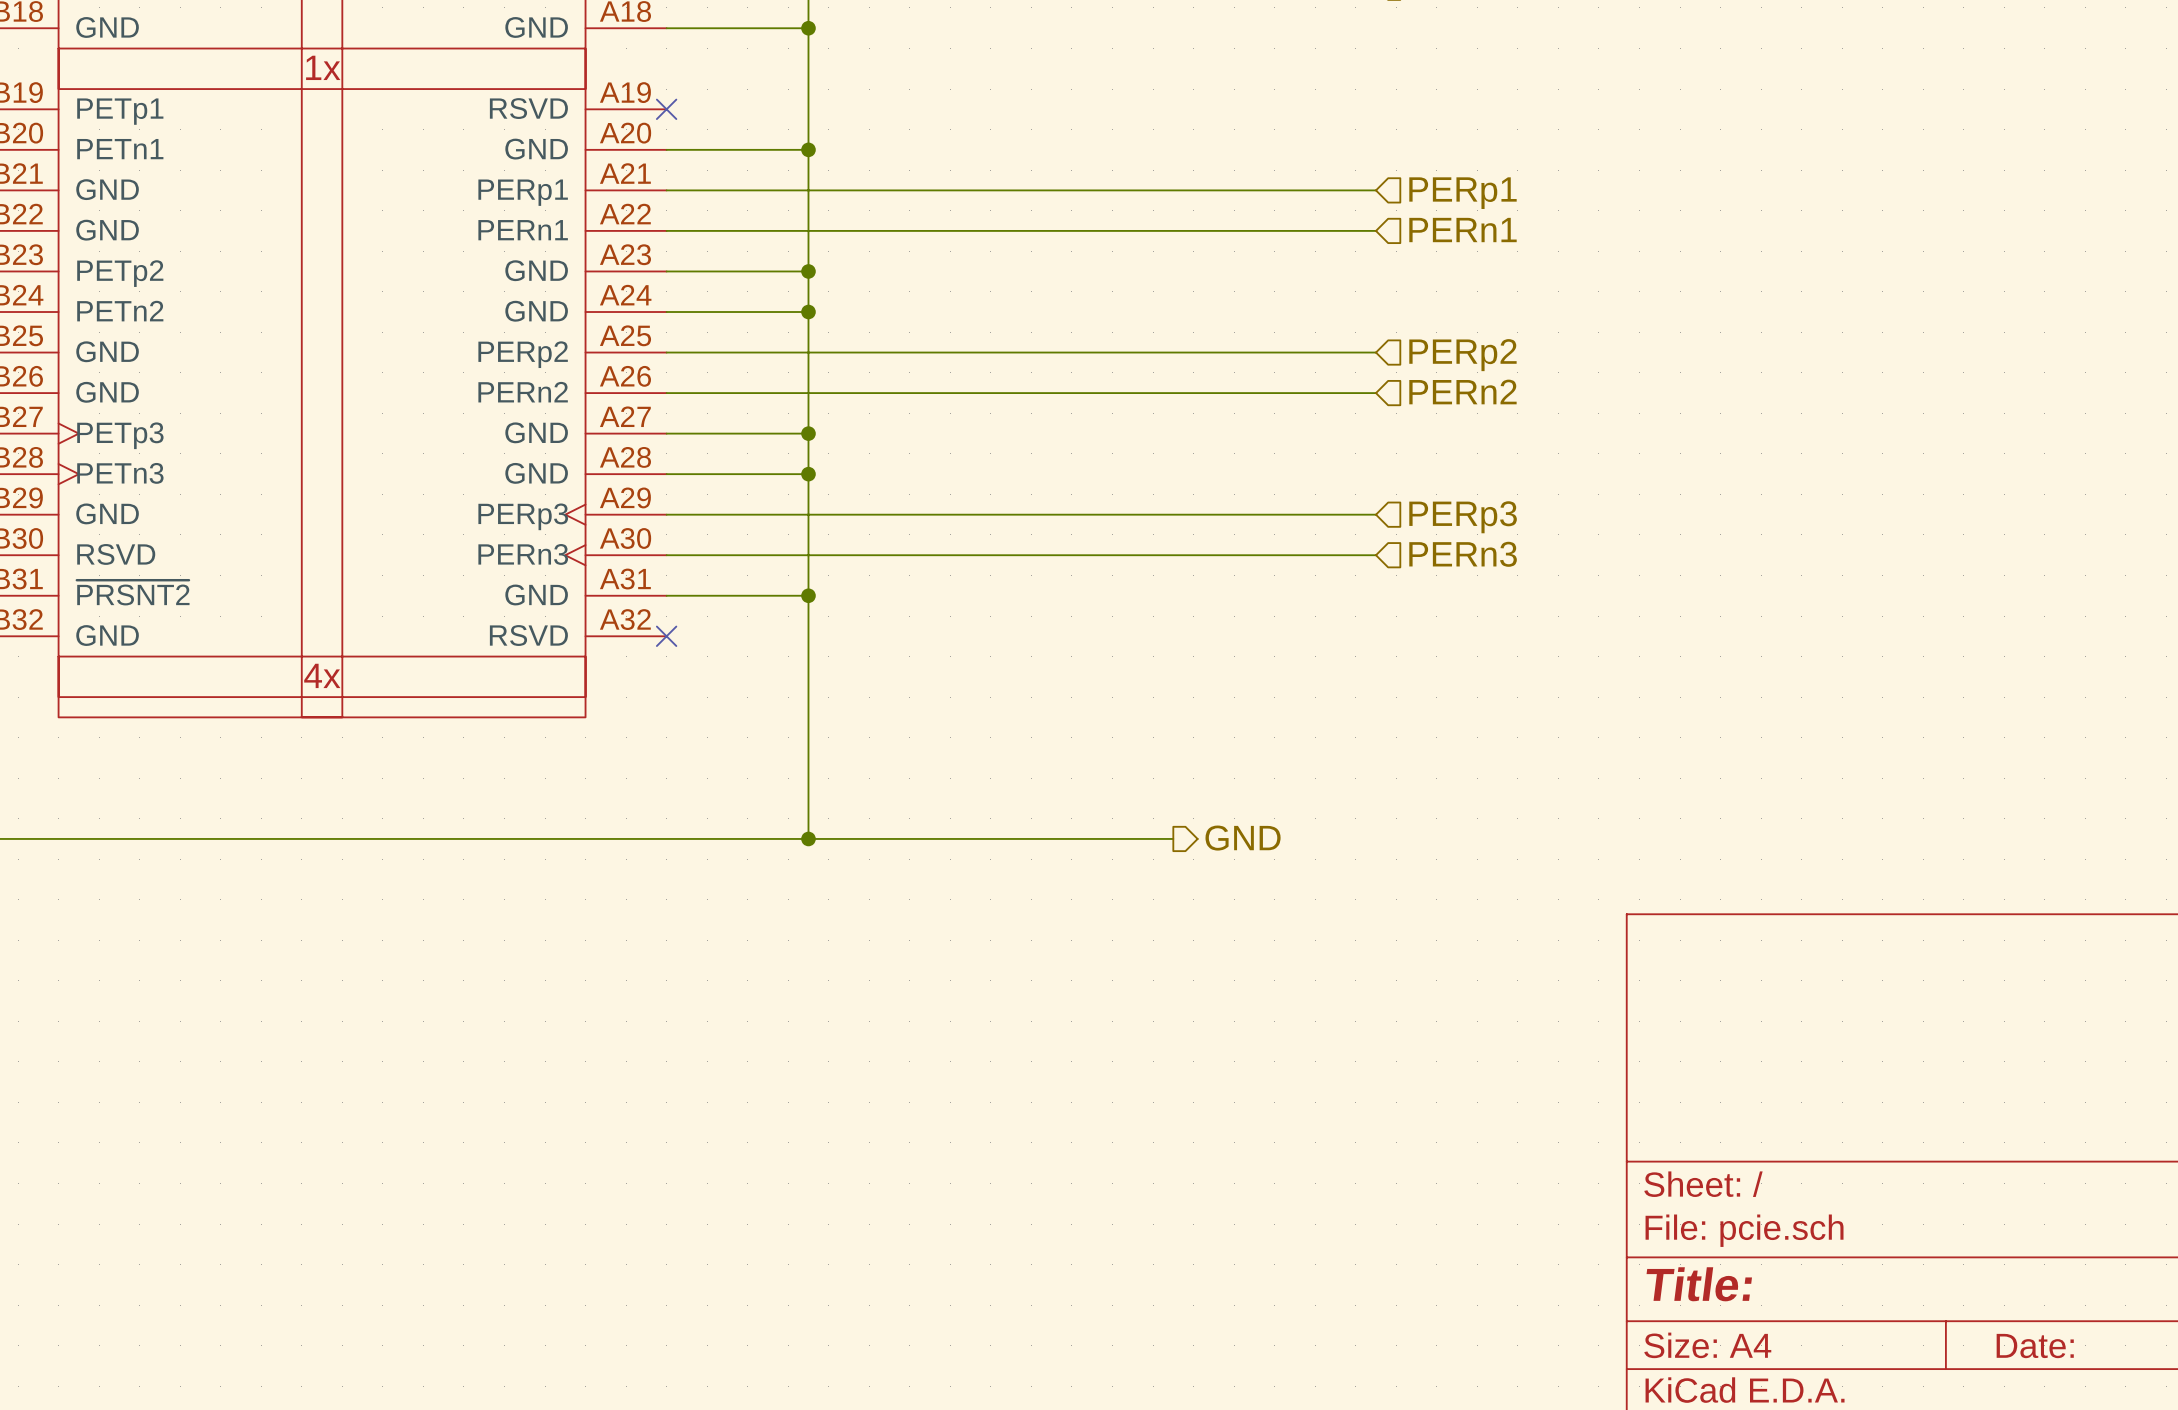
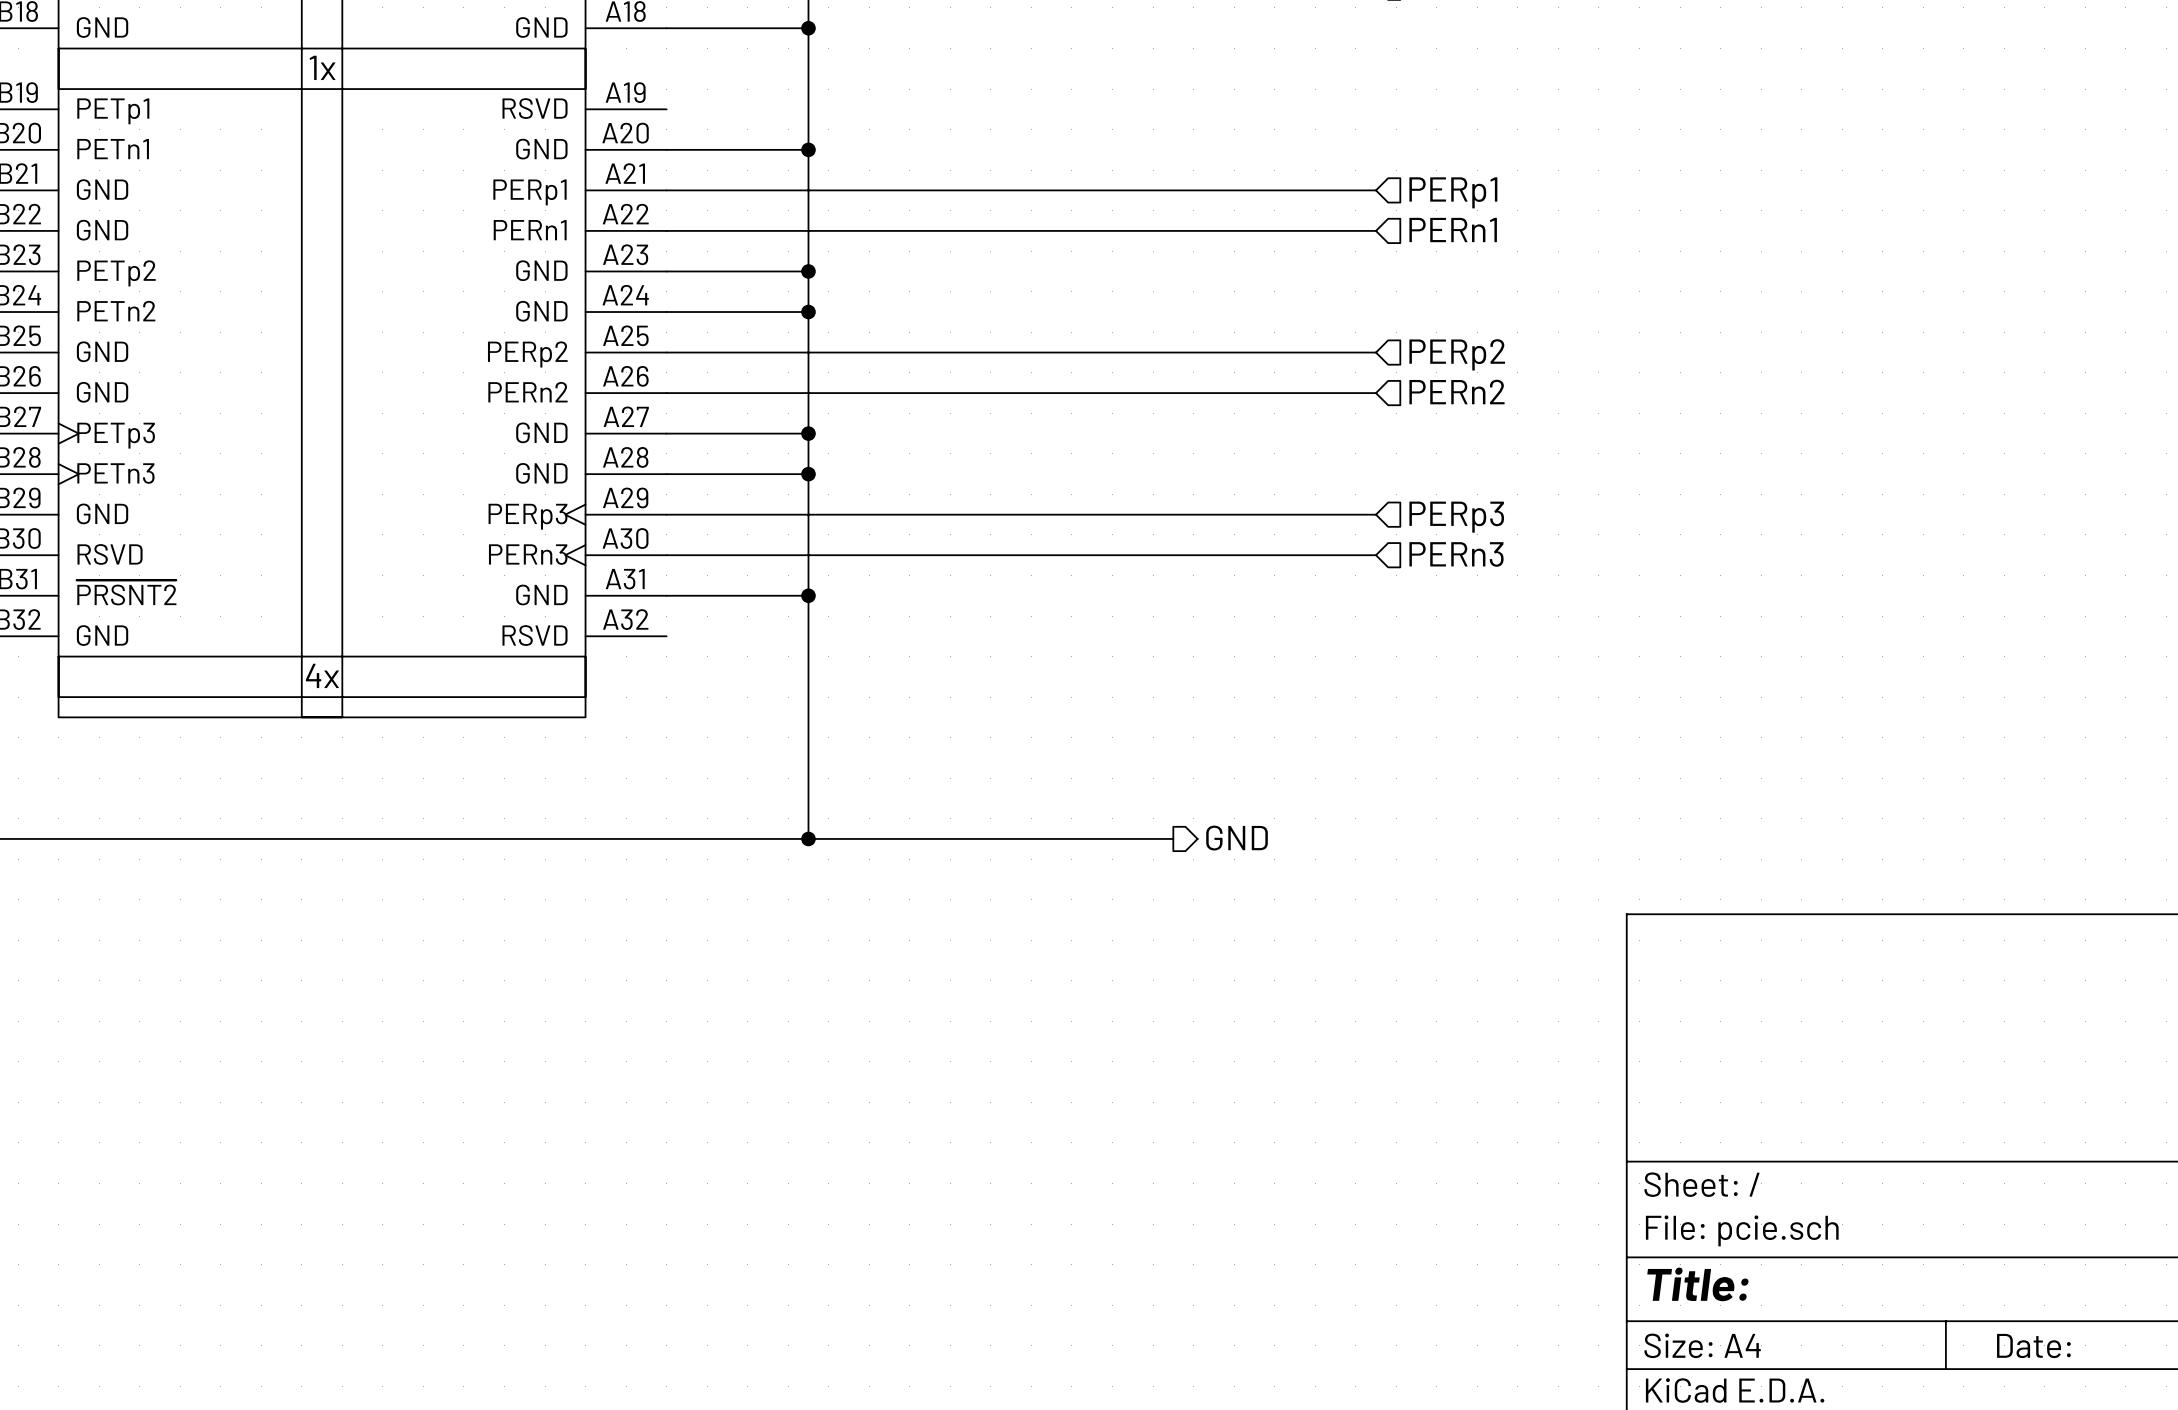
no-connect mark: (666, 109) -> none
no-connect mark: (666, 636) -> none

